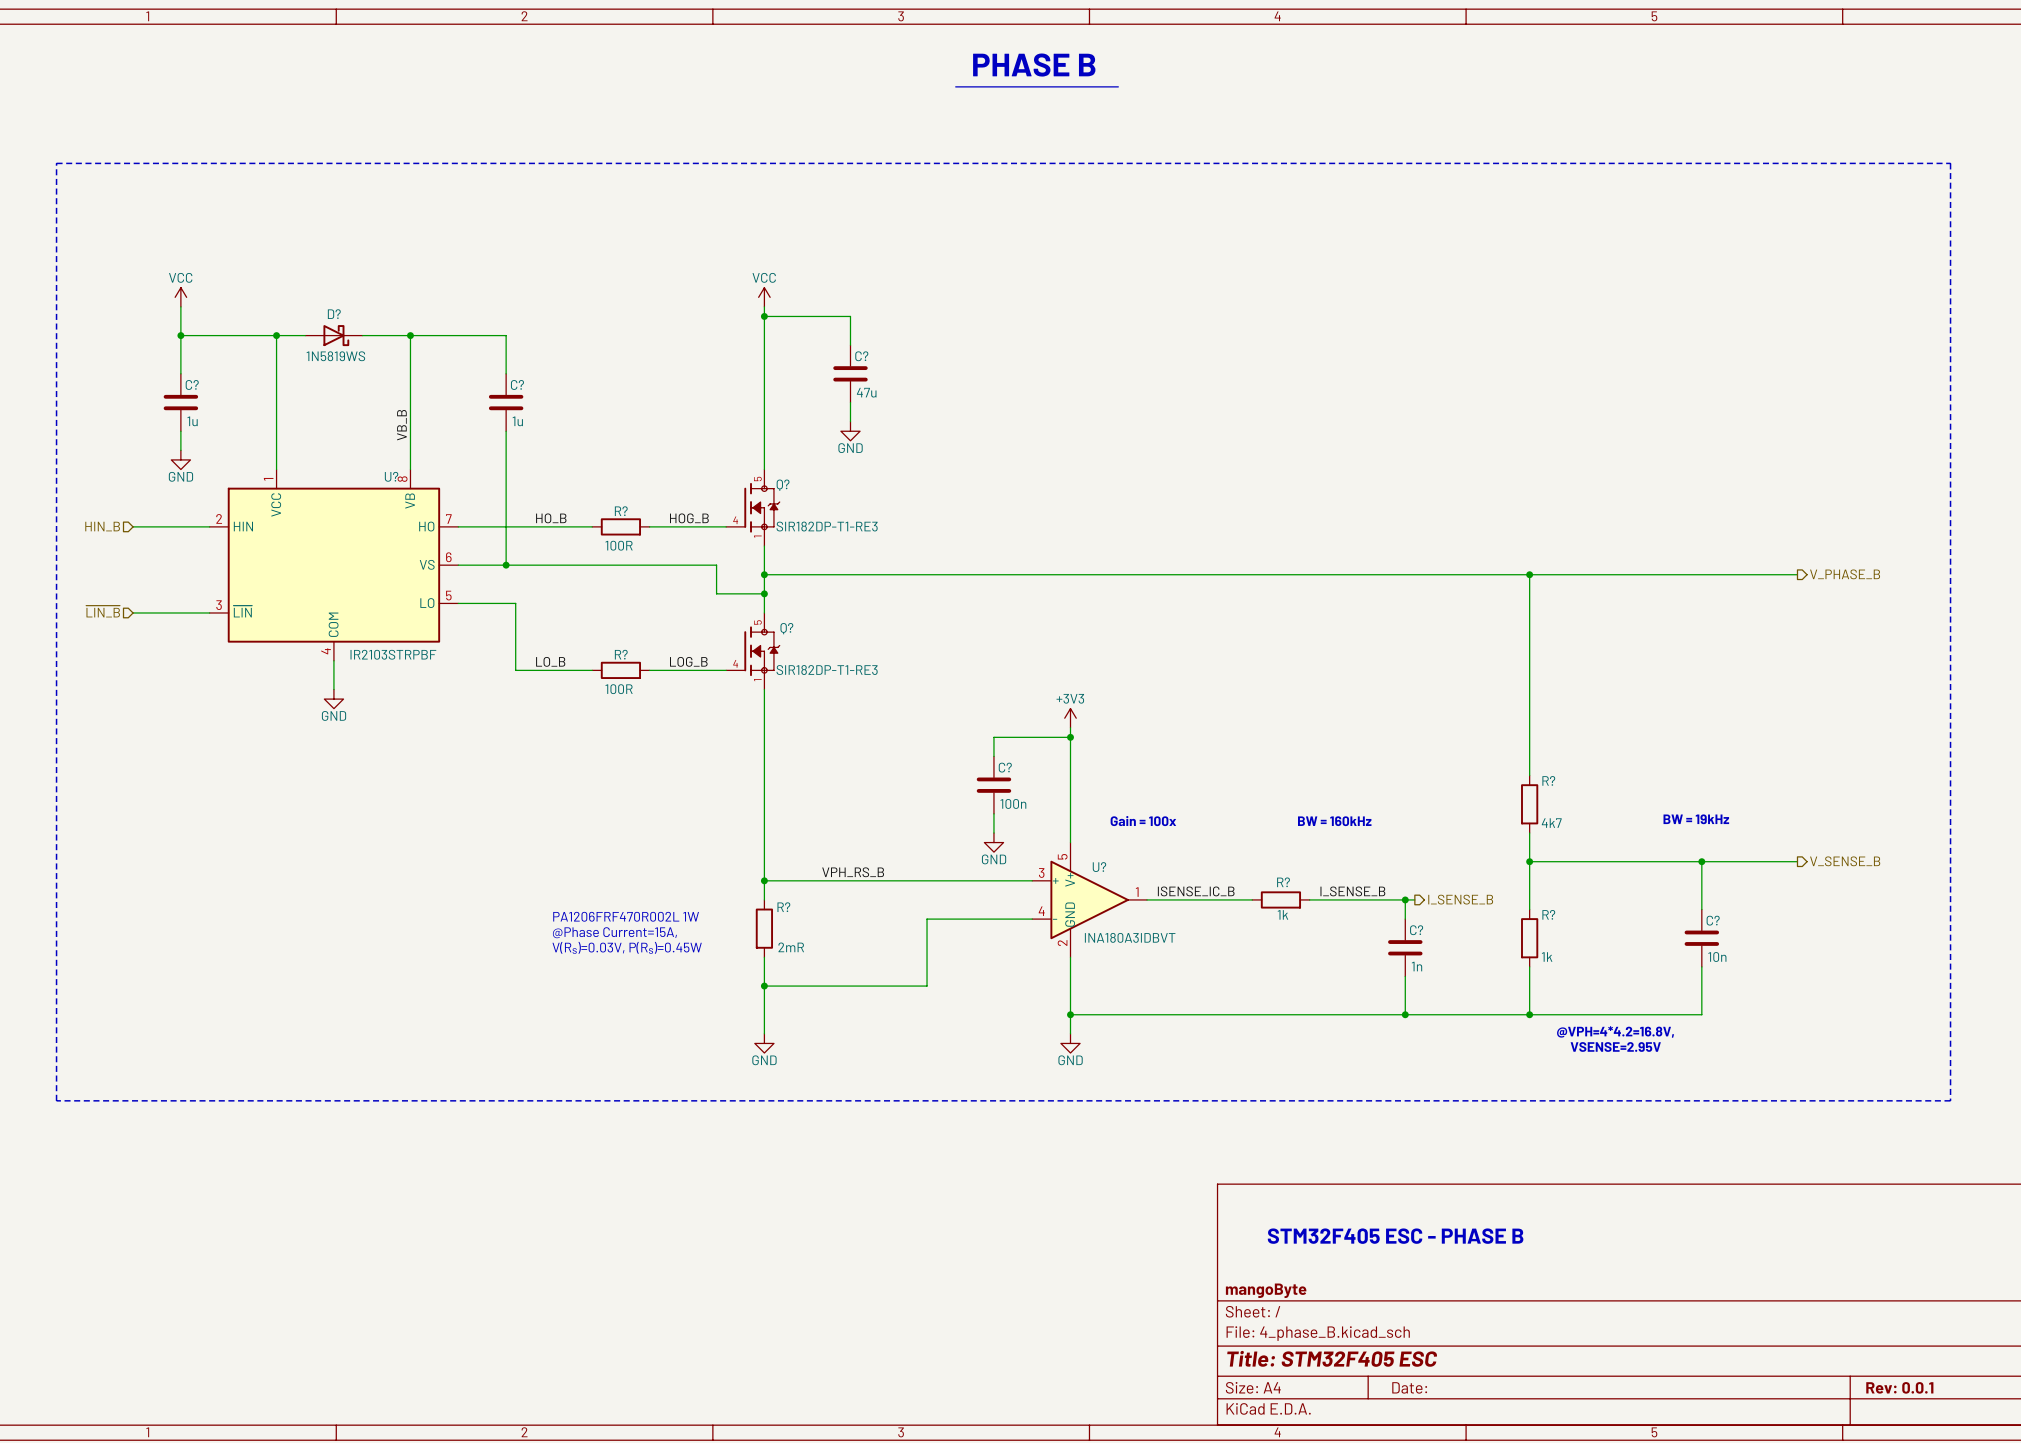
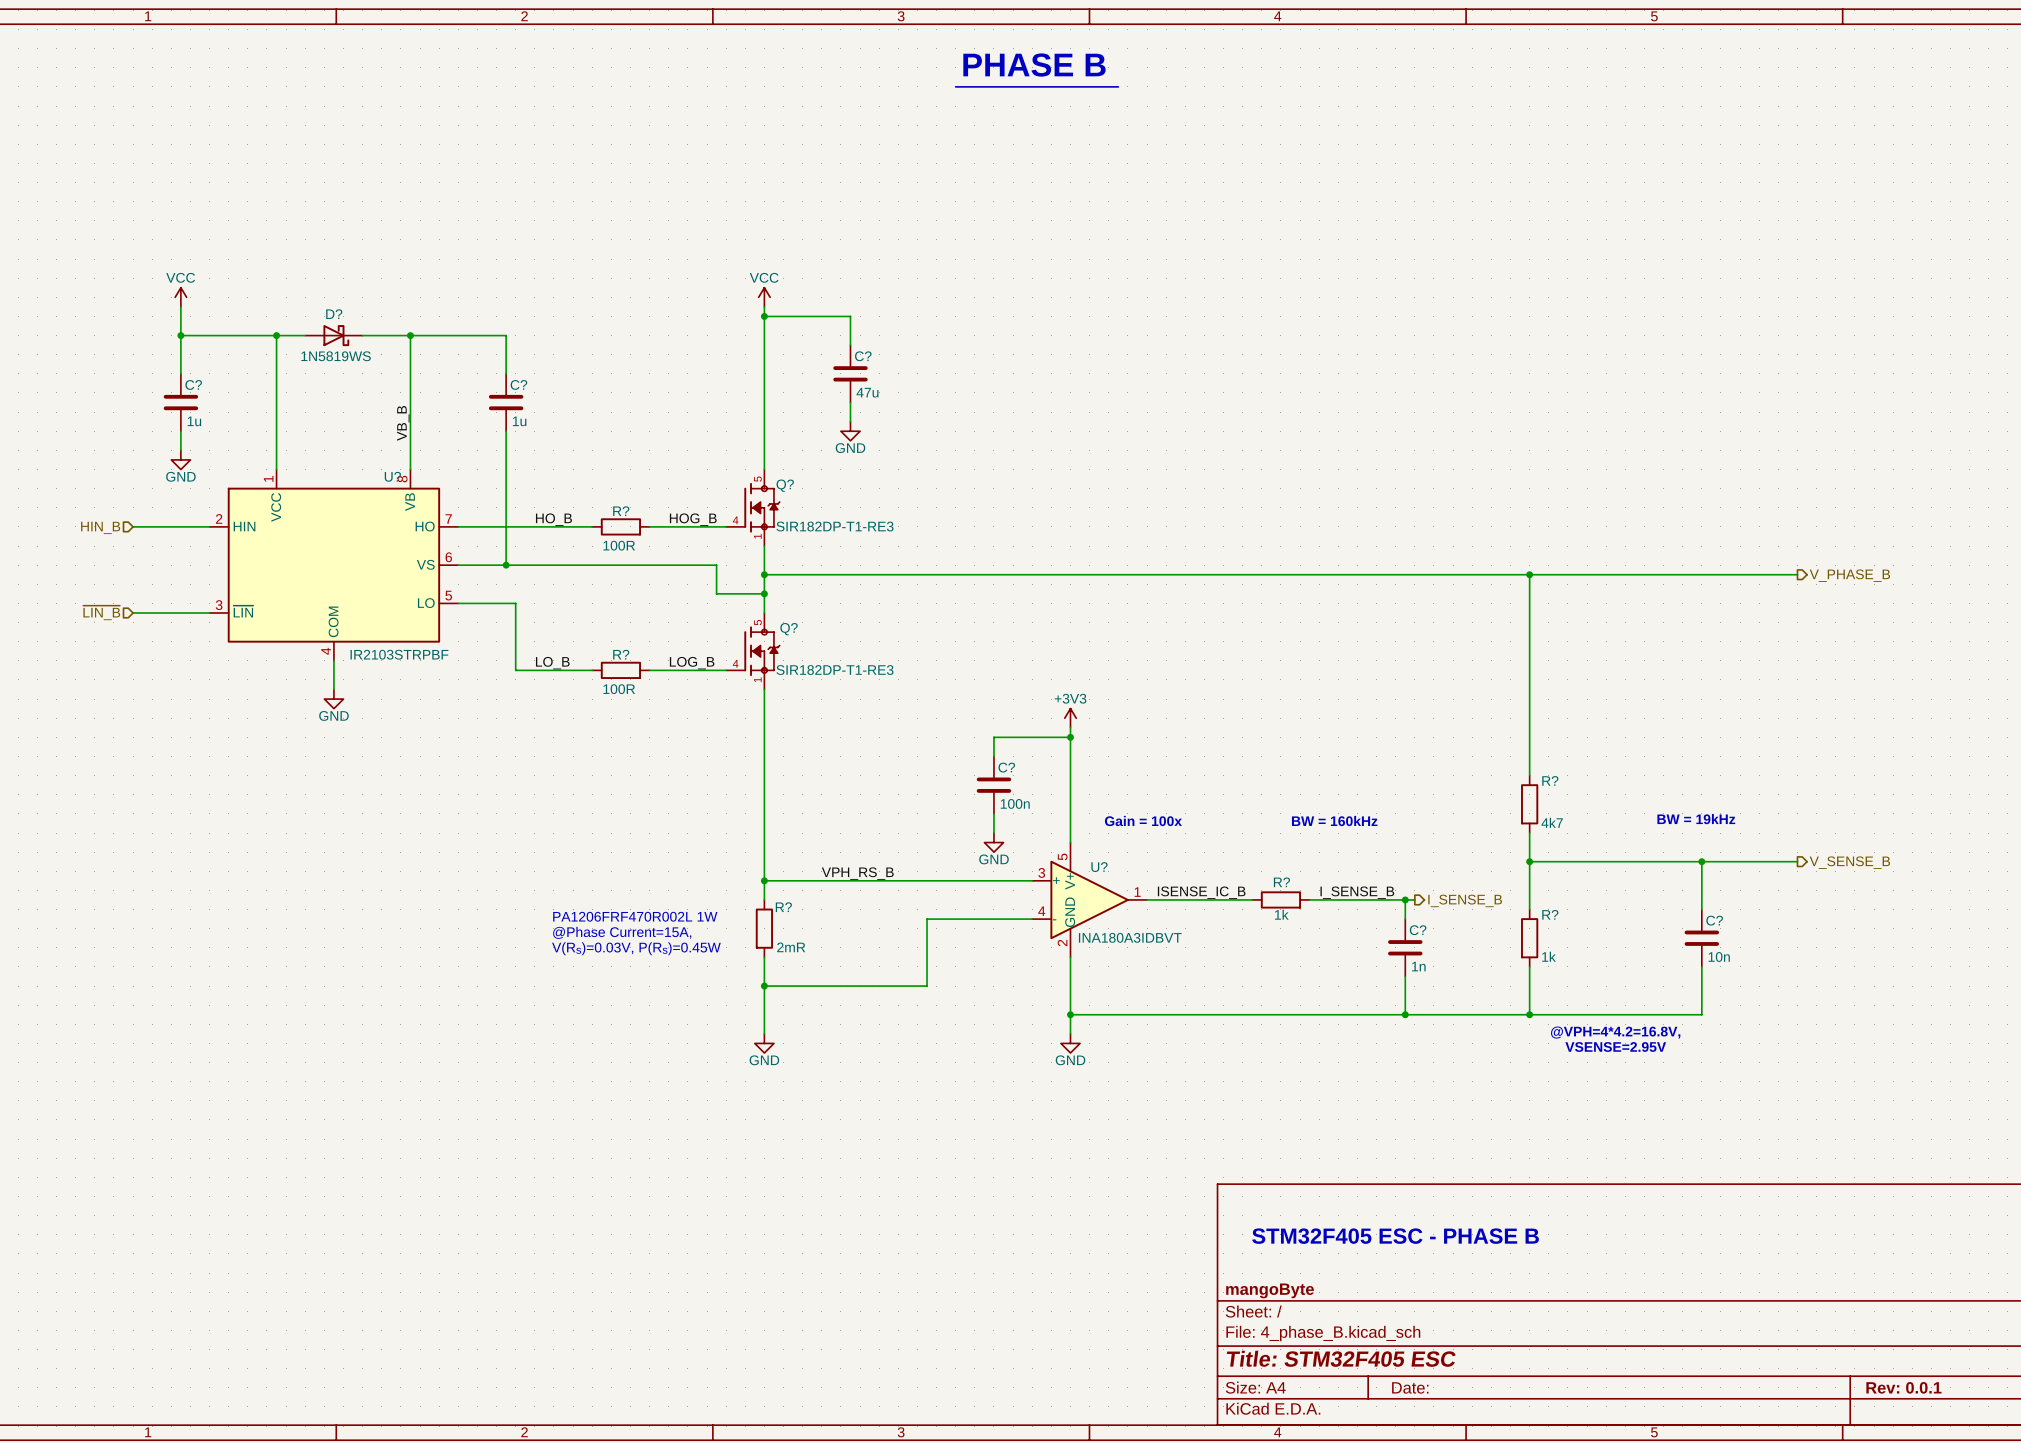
line: (56, 163) (1950, 163) (1950, 1100) (56, 1100) (56, 163) -> none

